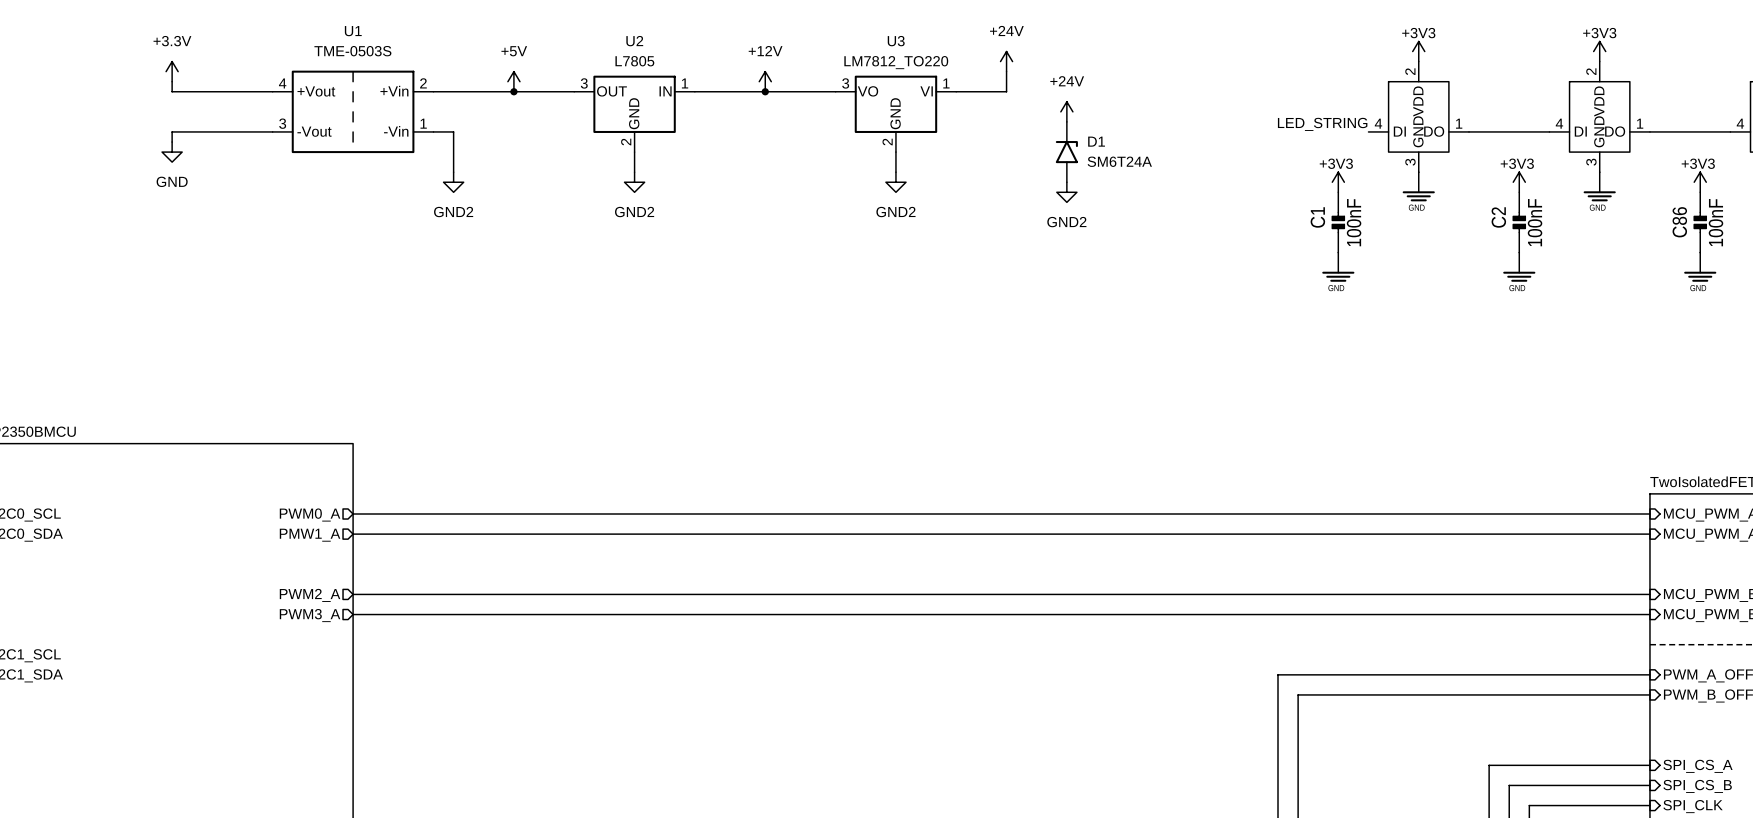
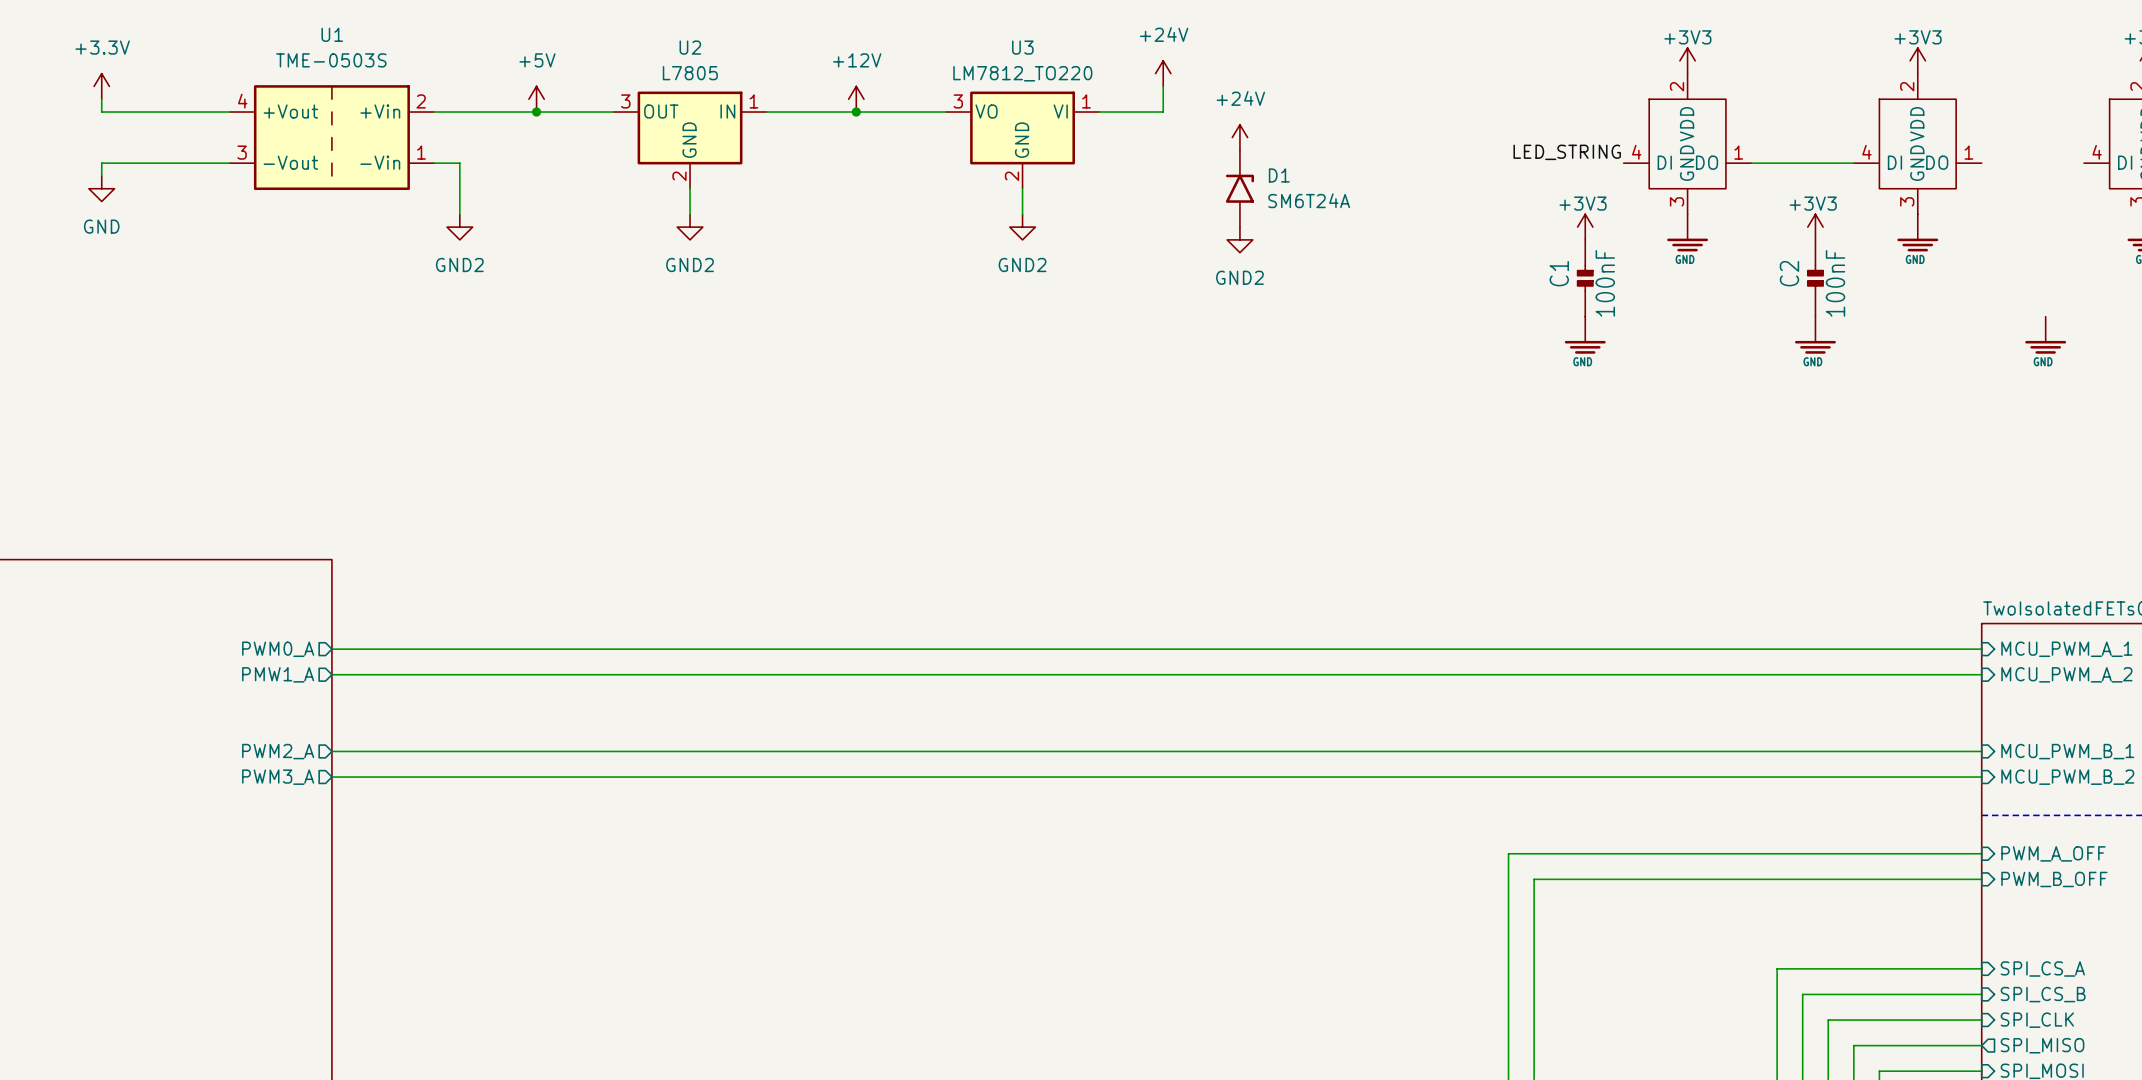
wire: (1649, 131) (1730, 131) -> none
power symbol: +3V3 (1700, 182) -> none
C86: 100nF (1700, 222) -> none

